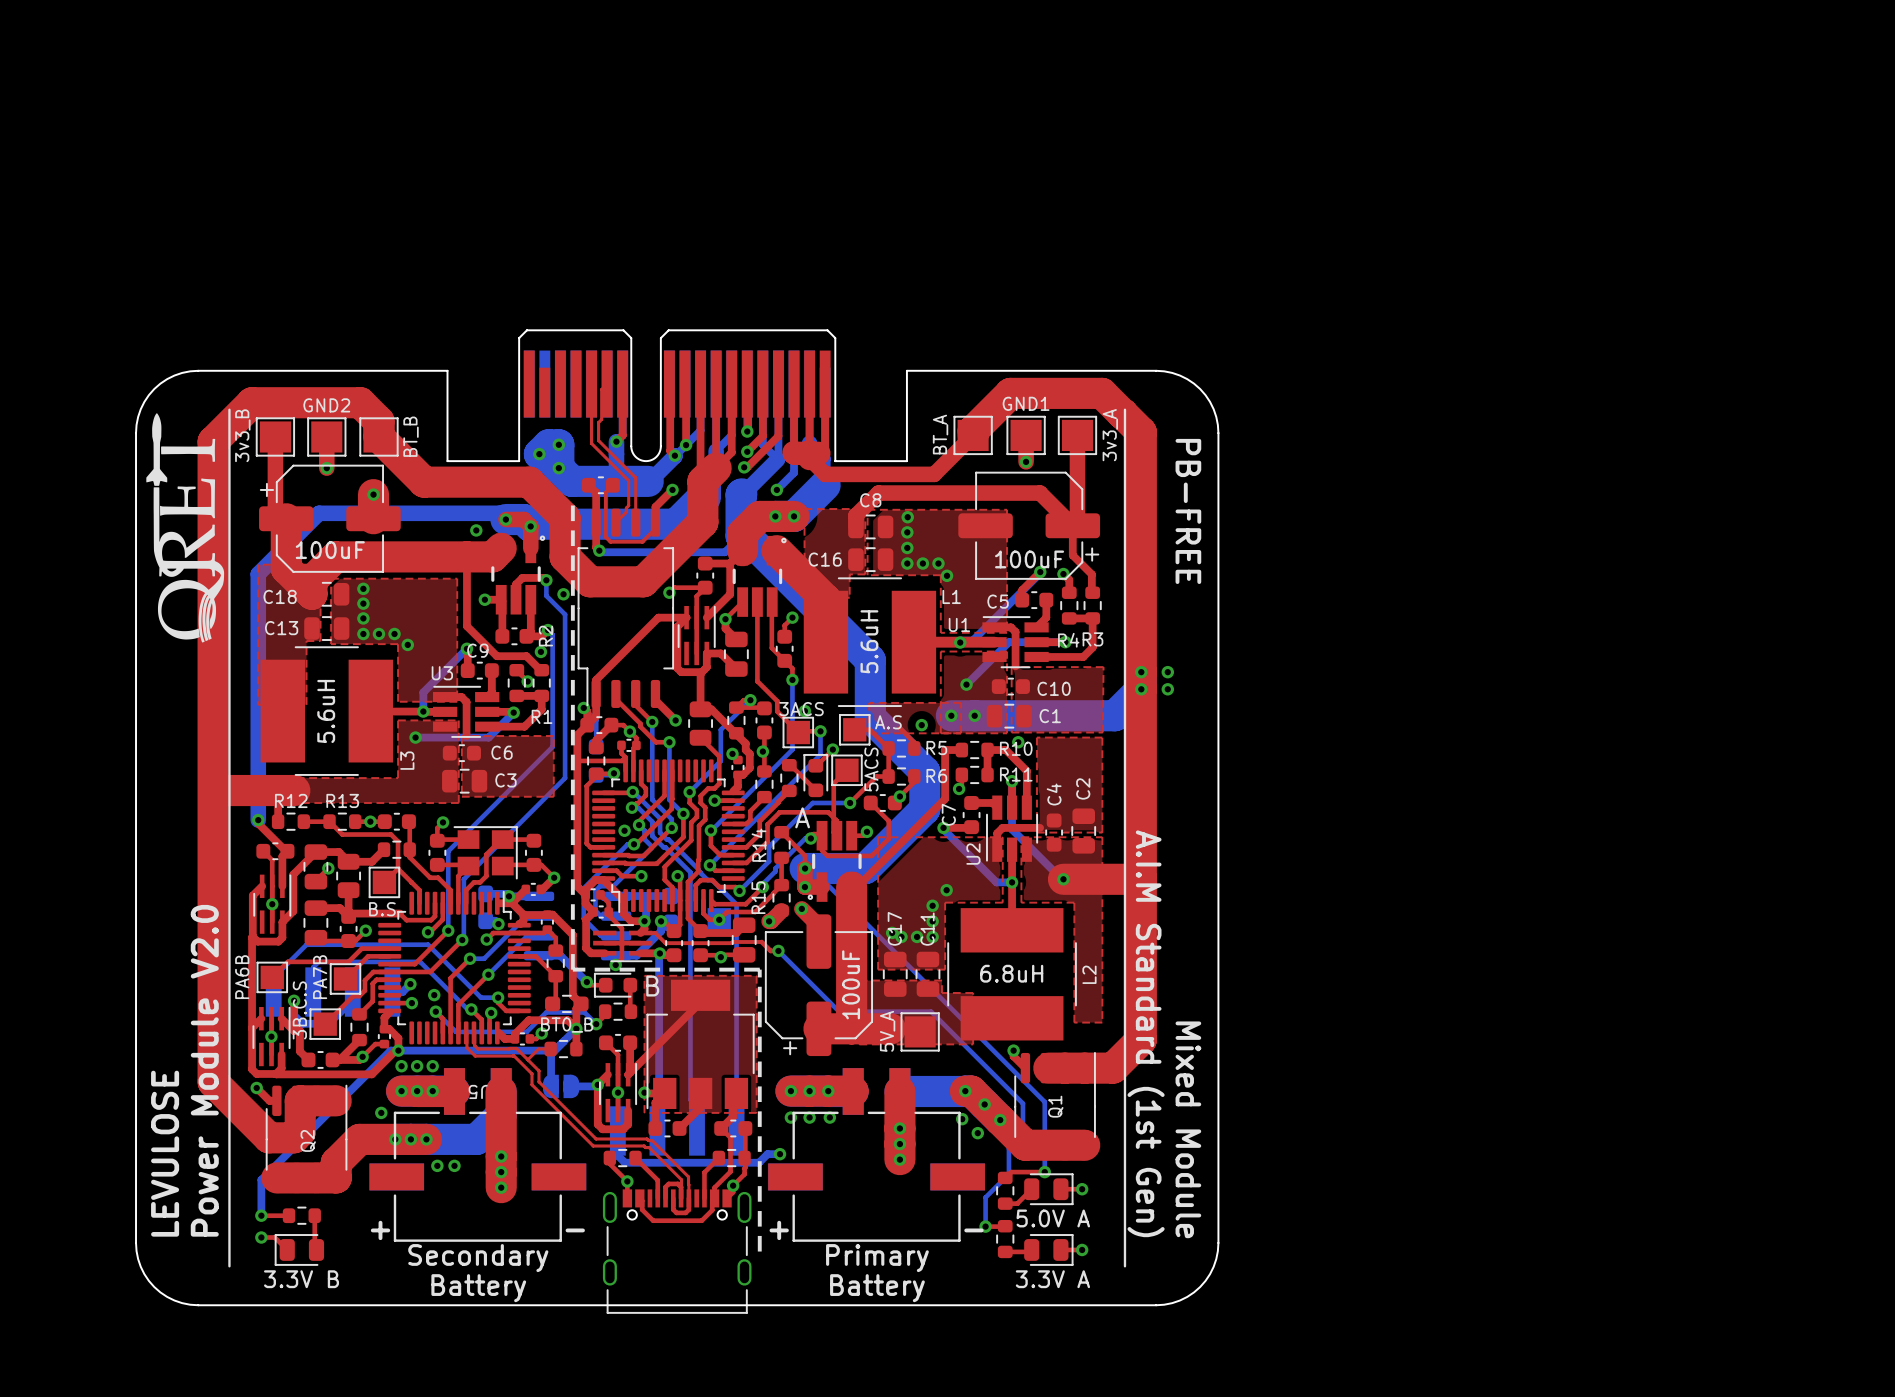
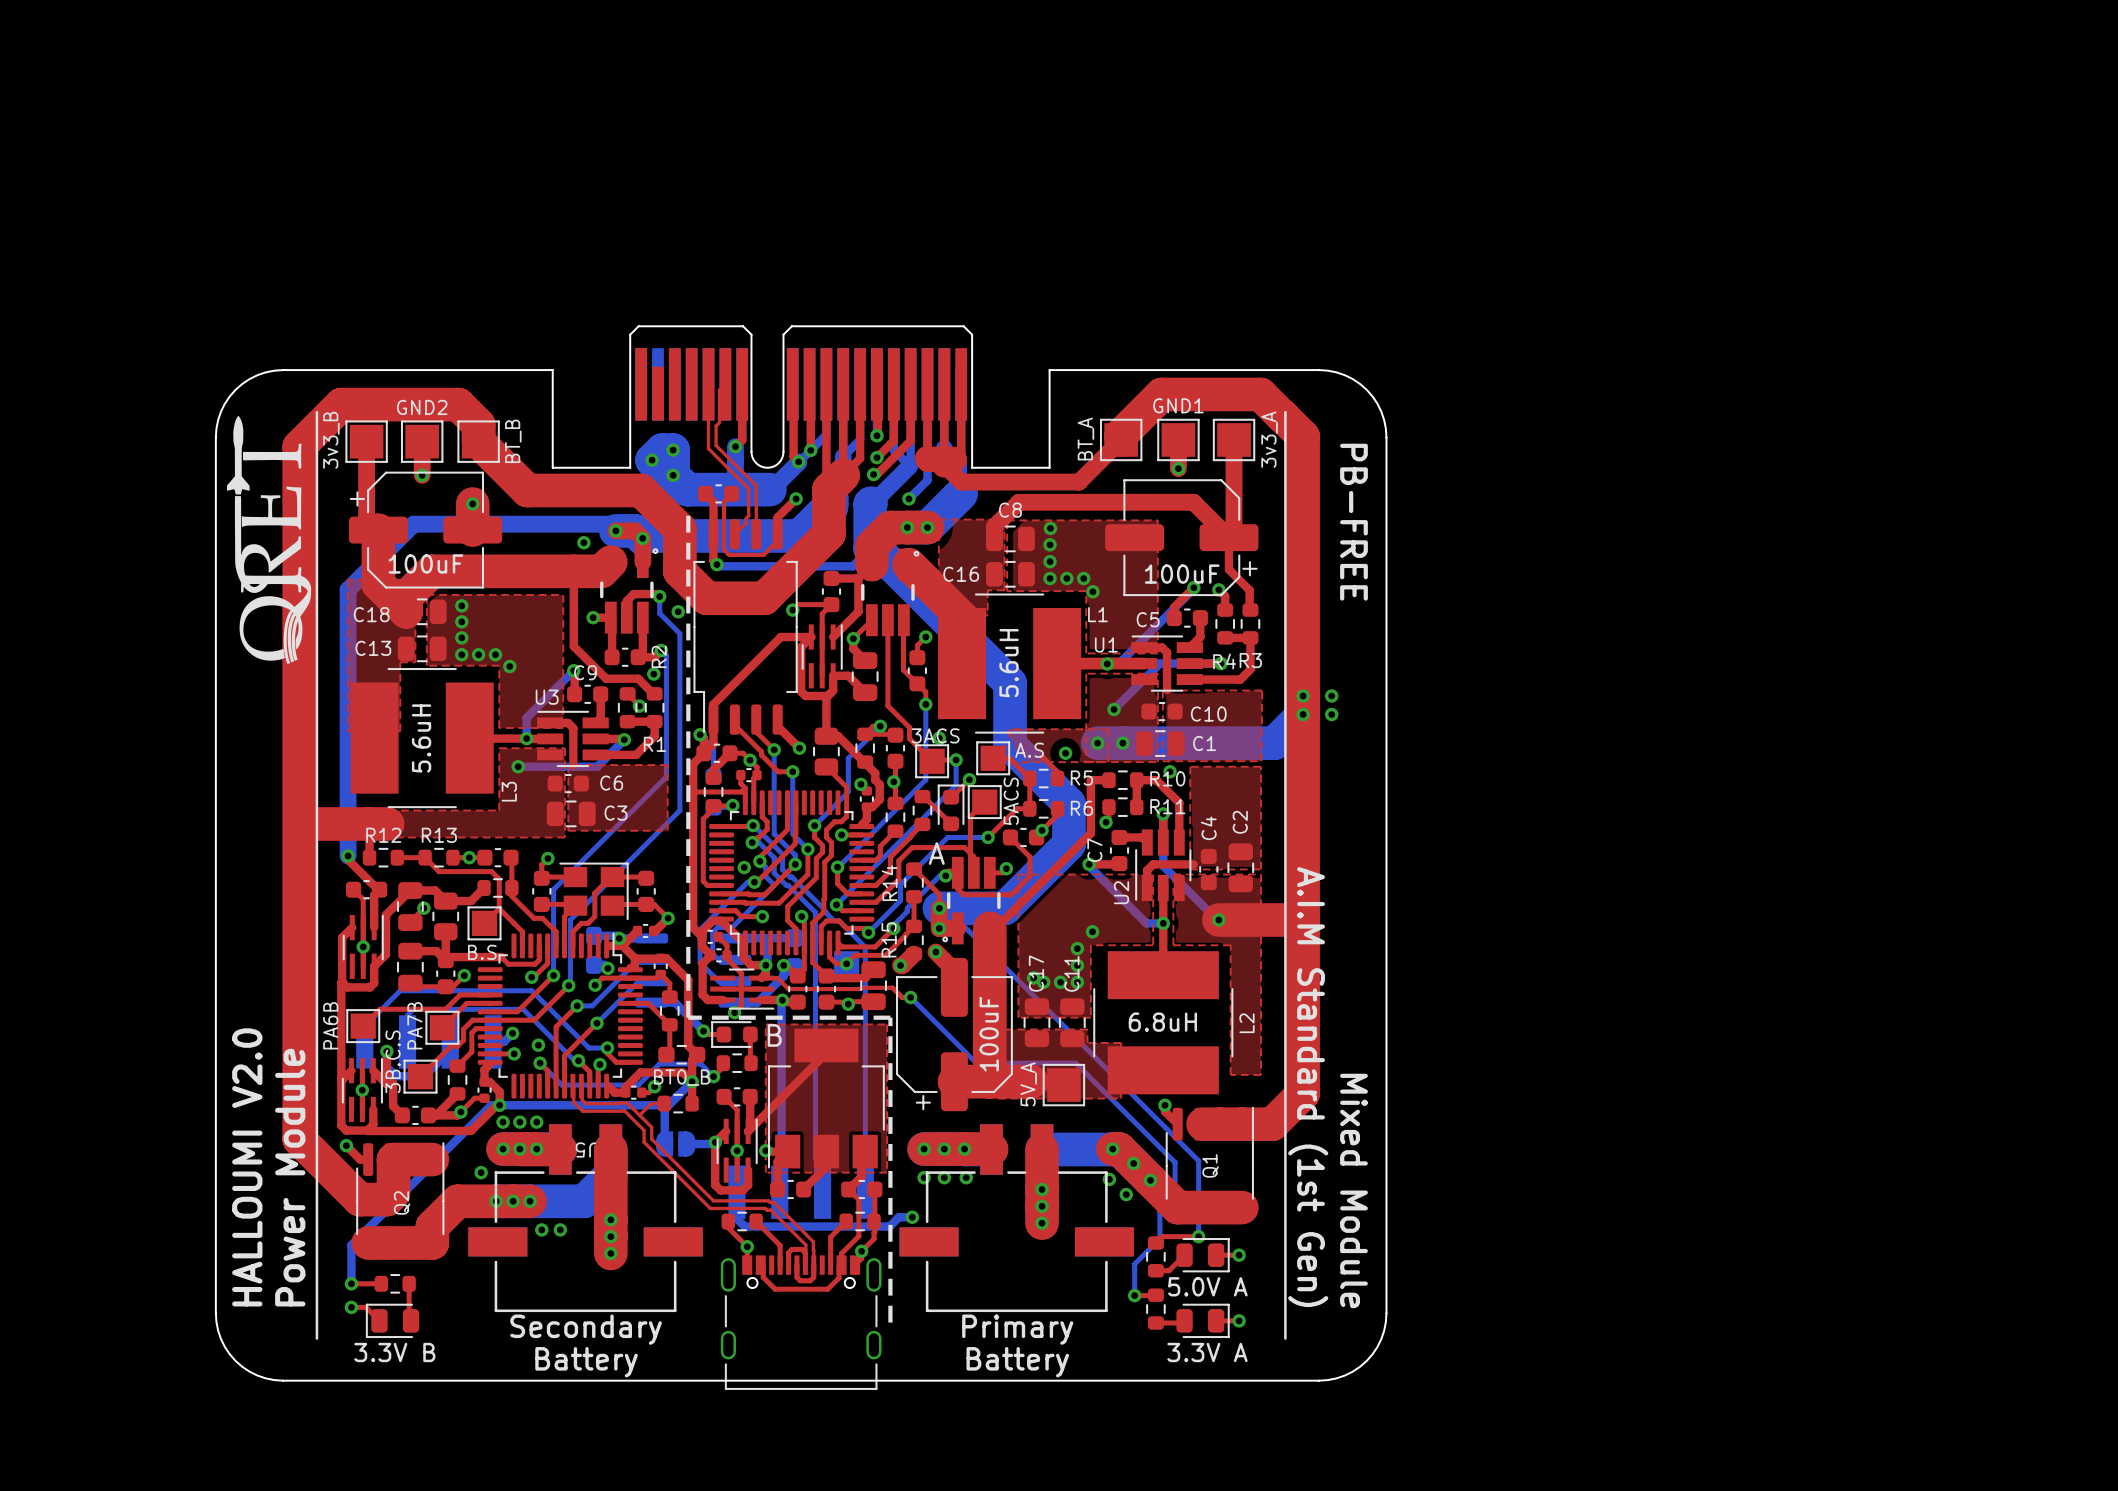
text: Power Module V2.0 (204, 1070) -> Power Module (290, 1177)
text: LEVULOSE (165, 1153) -> HALLOUMI V2.0 (247, 1167)
text: + - (477, 1230) -> none
text: + - (876, 1230) -> none

